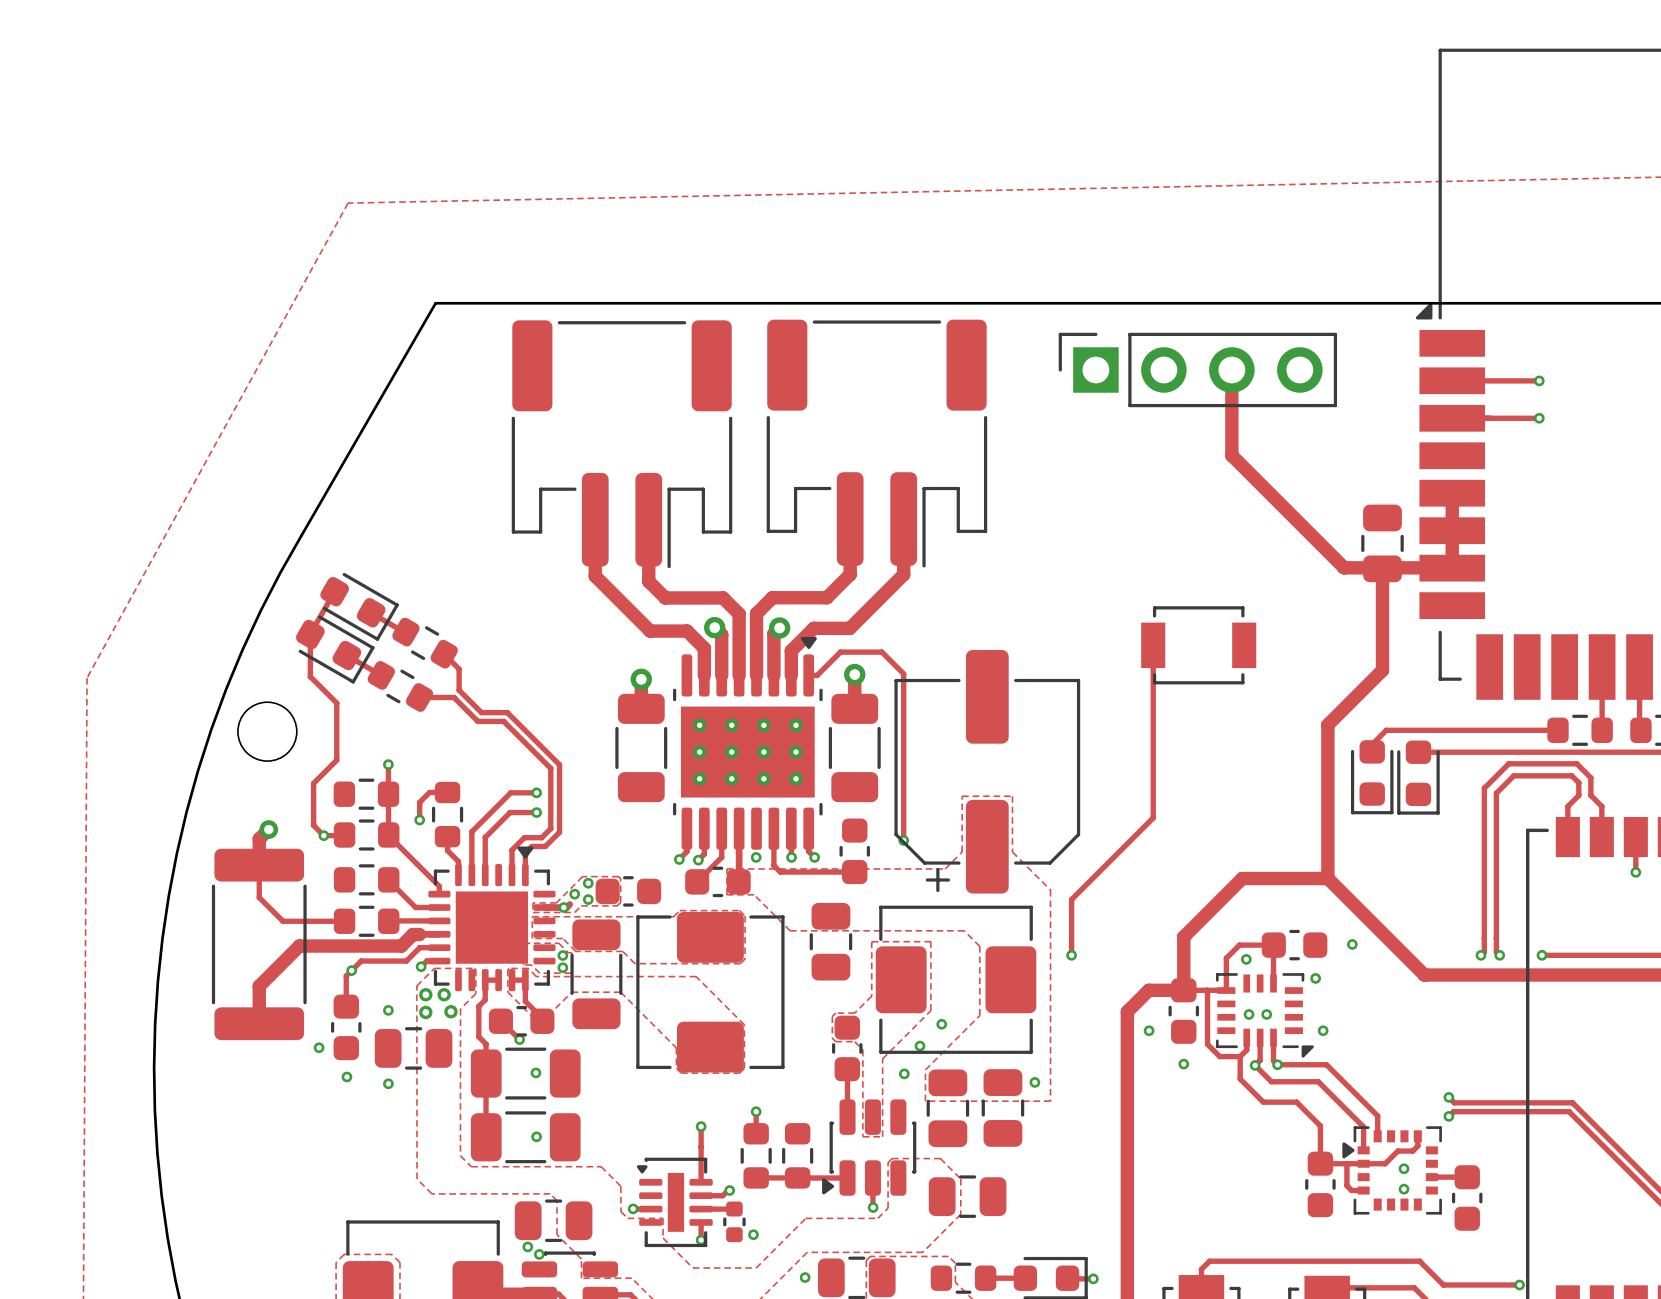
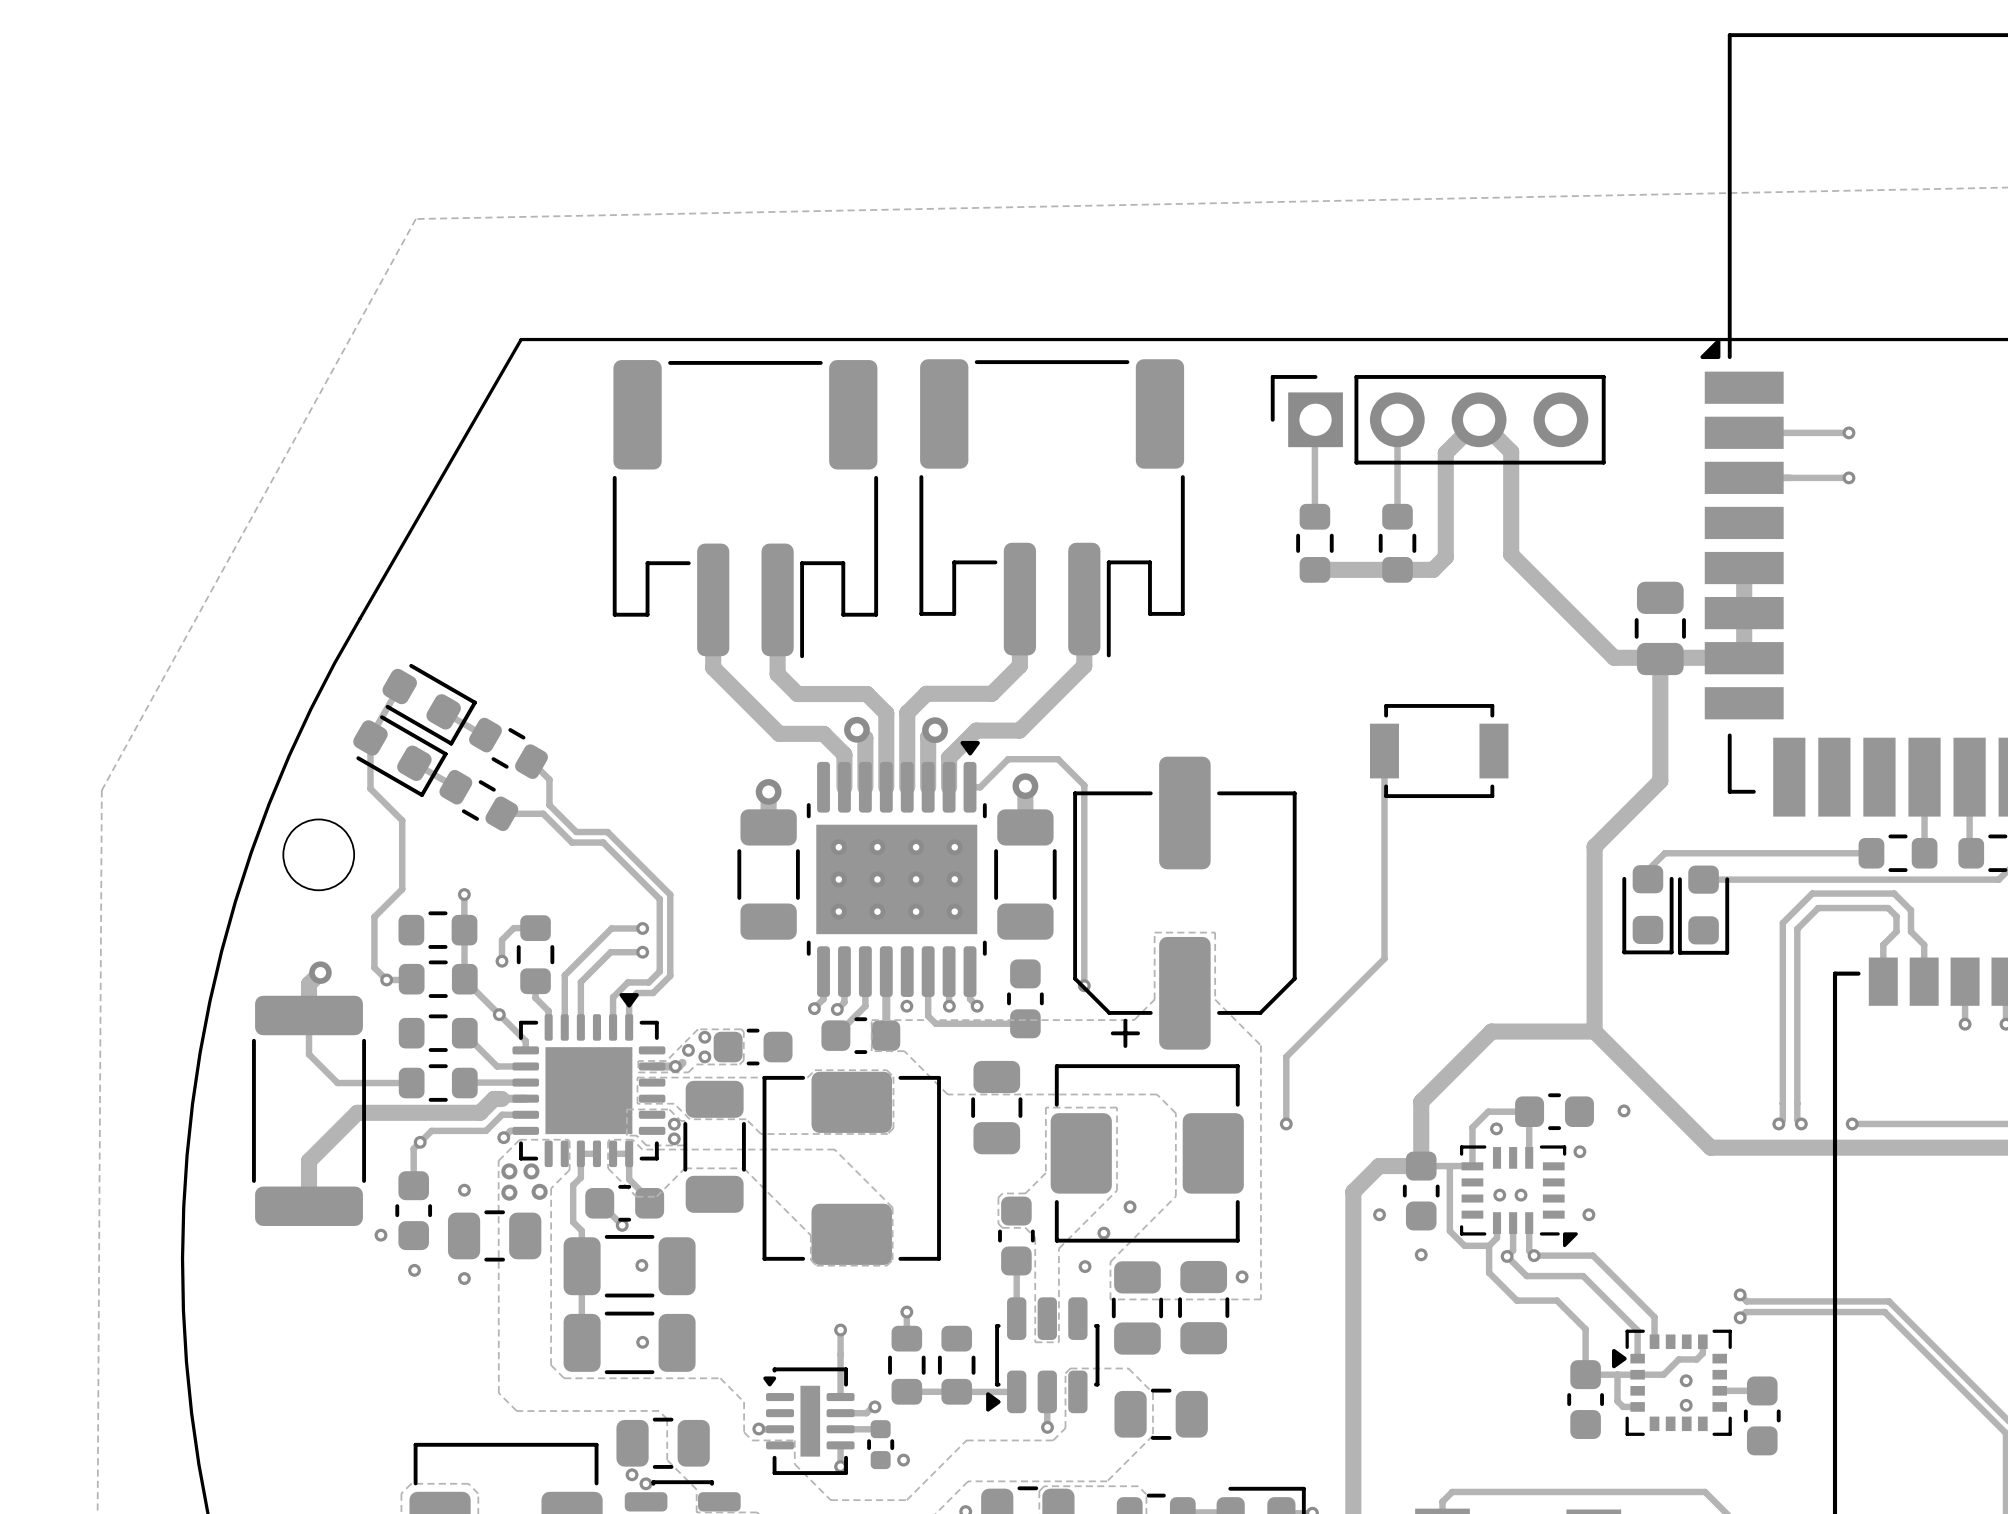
track: (1231, 369) (1231, 455) (1258, 482) -> (1314, 569) (1433, 569) (1445, 557) (1445, 453) (1479, 419) (1511, 451) (1511, 554)
track: none -> (1314, 420) (1314, 516)
track: none -> (1397, 419) (1397, 516)
part: none -> (1314, 543)
part: none -> (1397, 543)
via: none -> (499, 1014)

